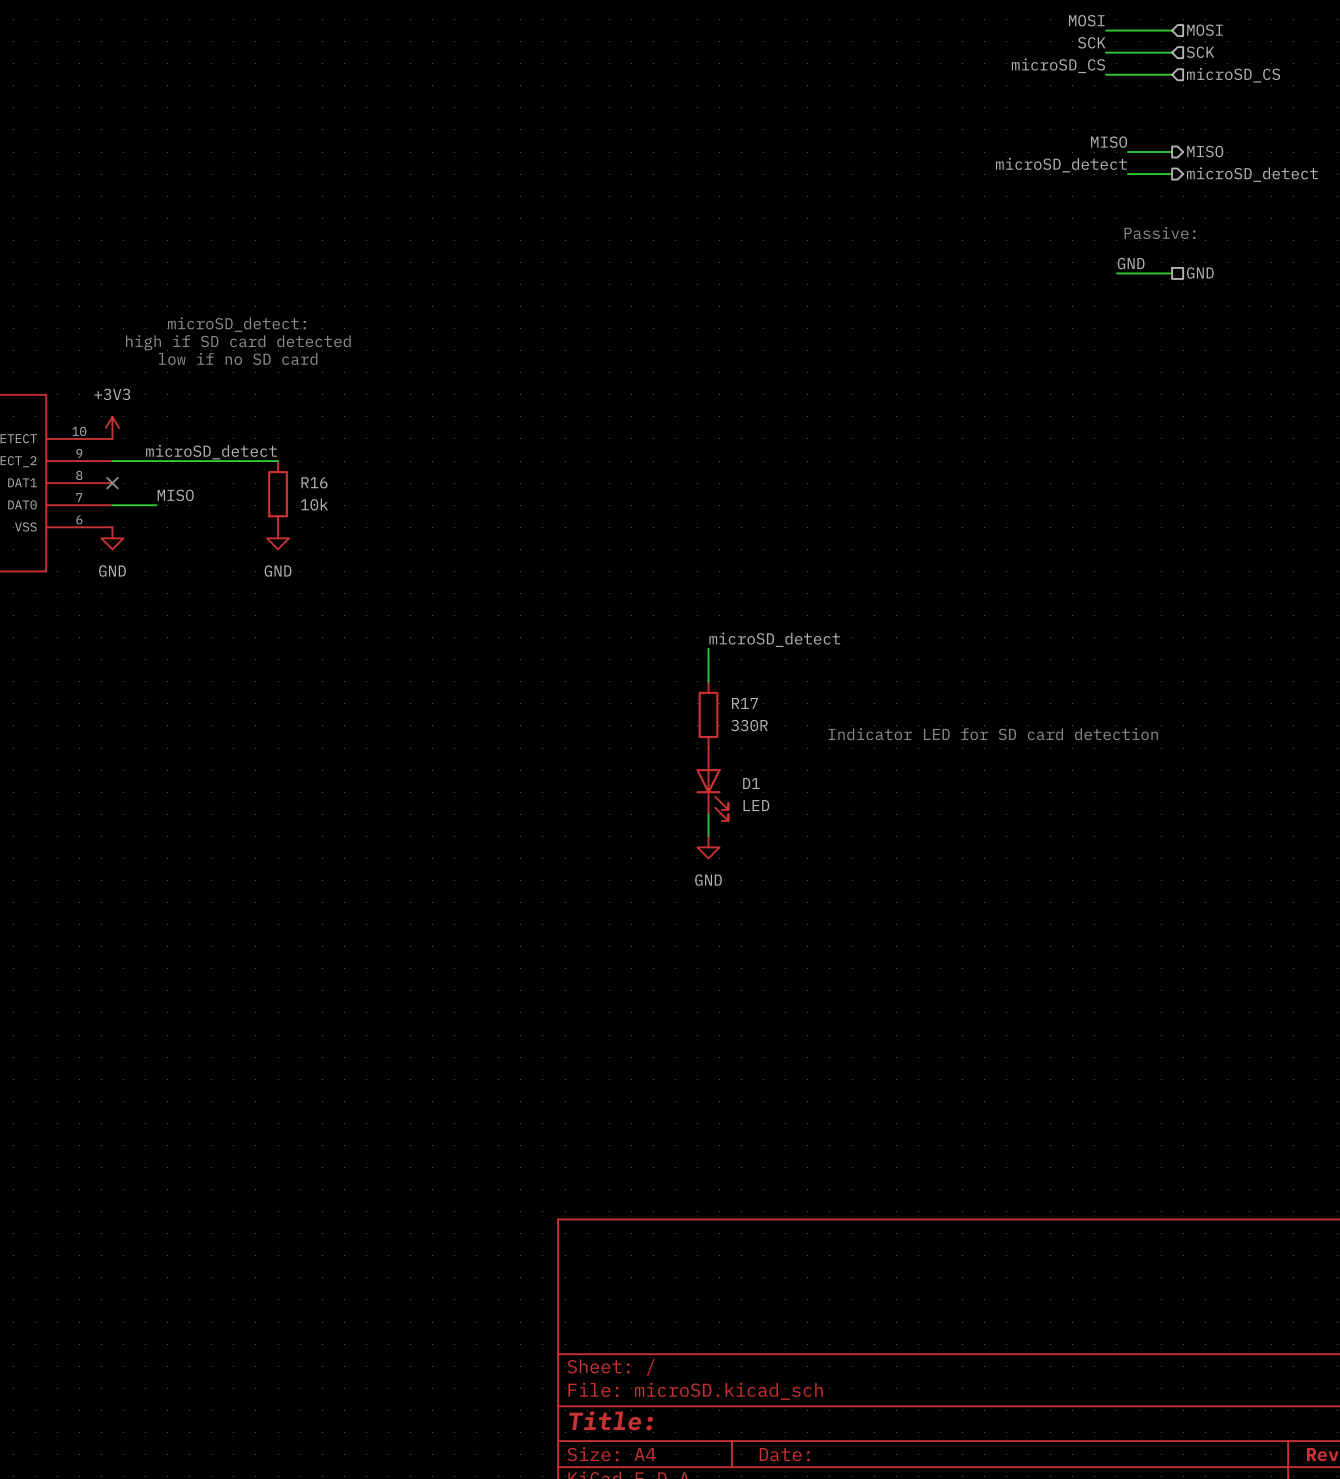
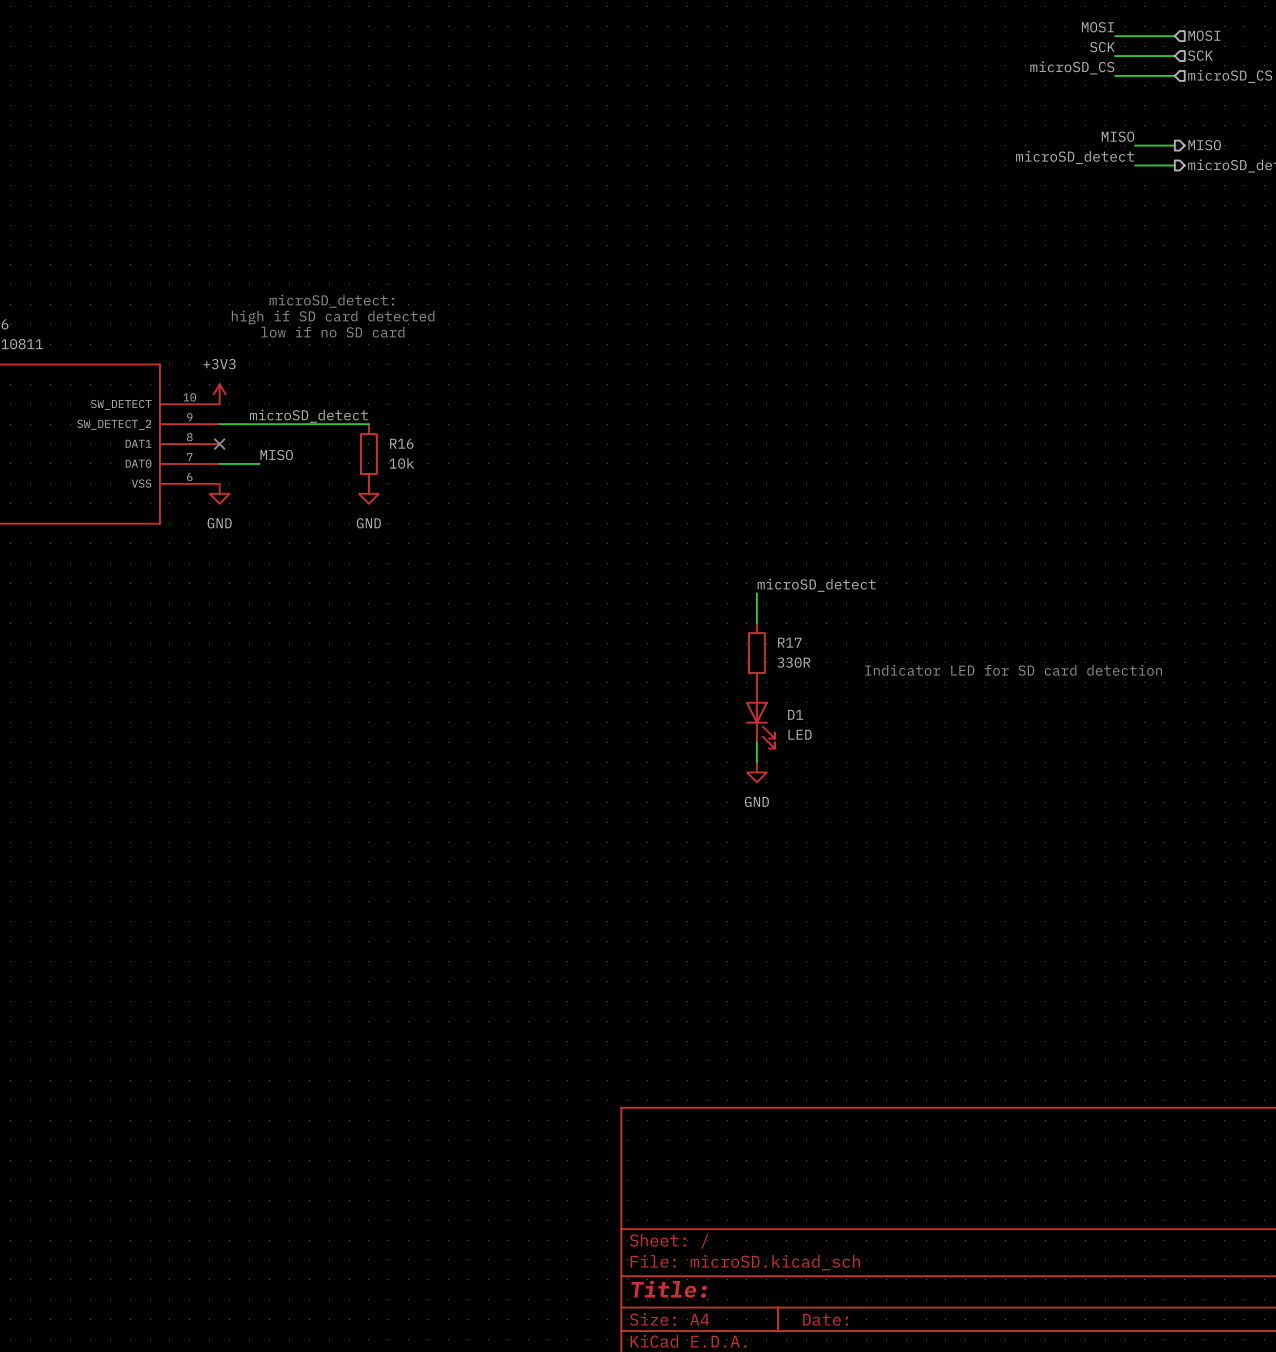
text: Passive: (1160, 233) -> none
label: GND (1131, 263) -> none
wire: (1116, 273) (1172, 273) -> none
hierarchical label: GND (1200, 273) -> none

